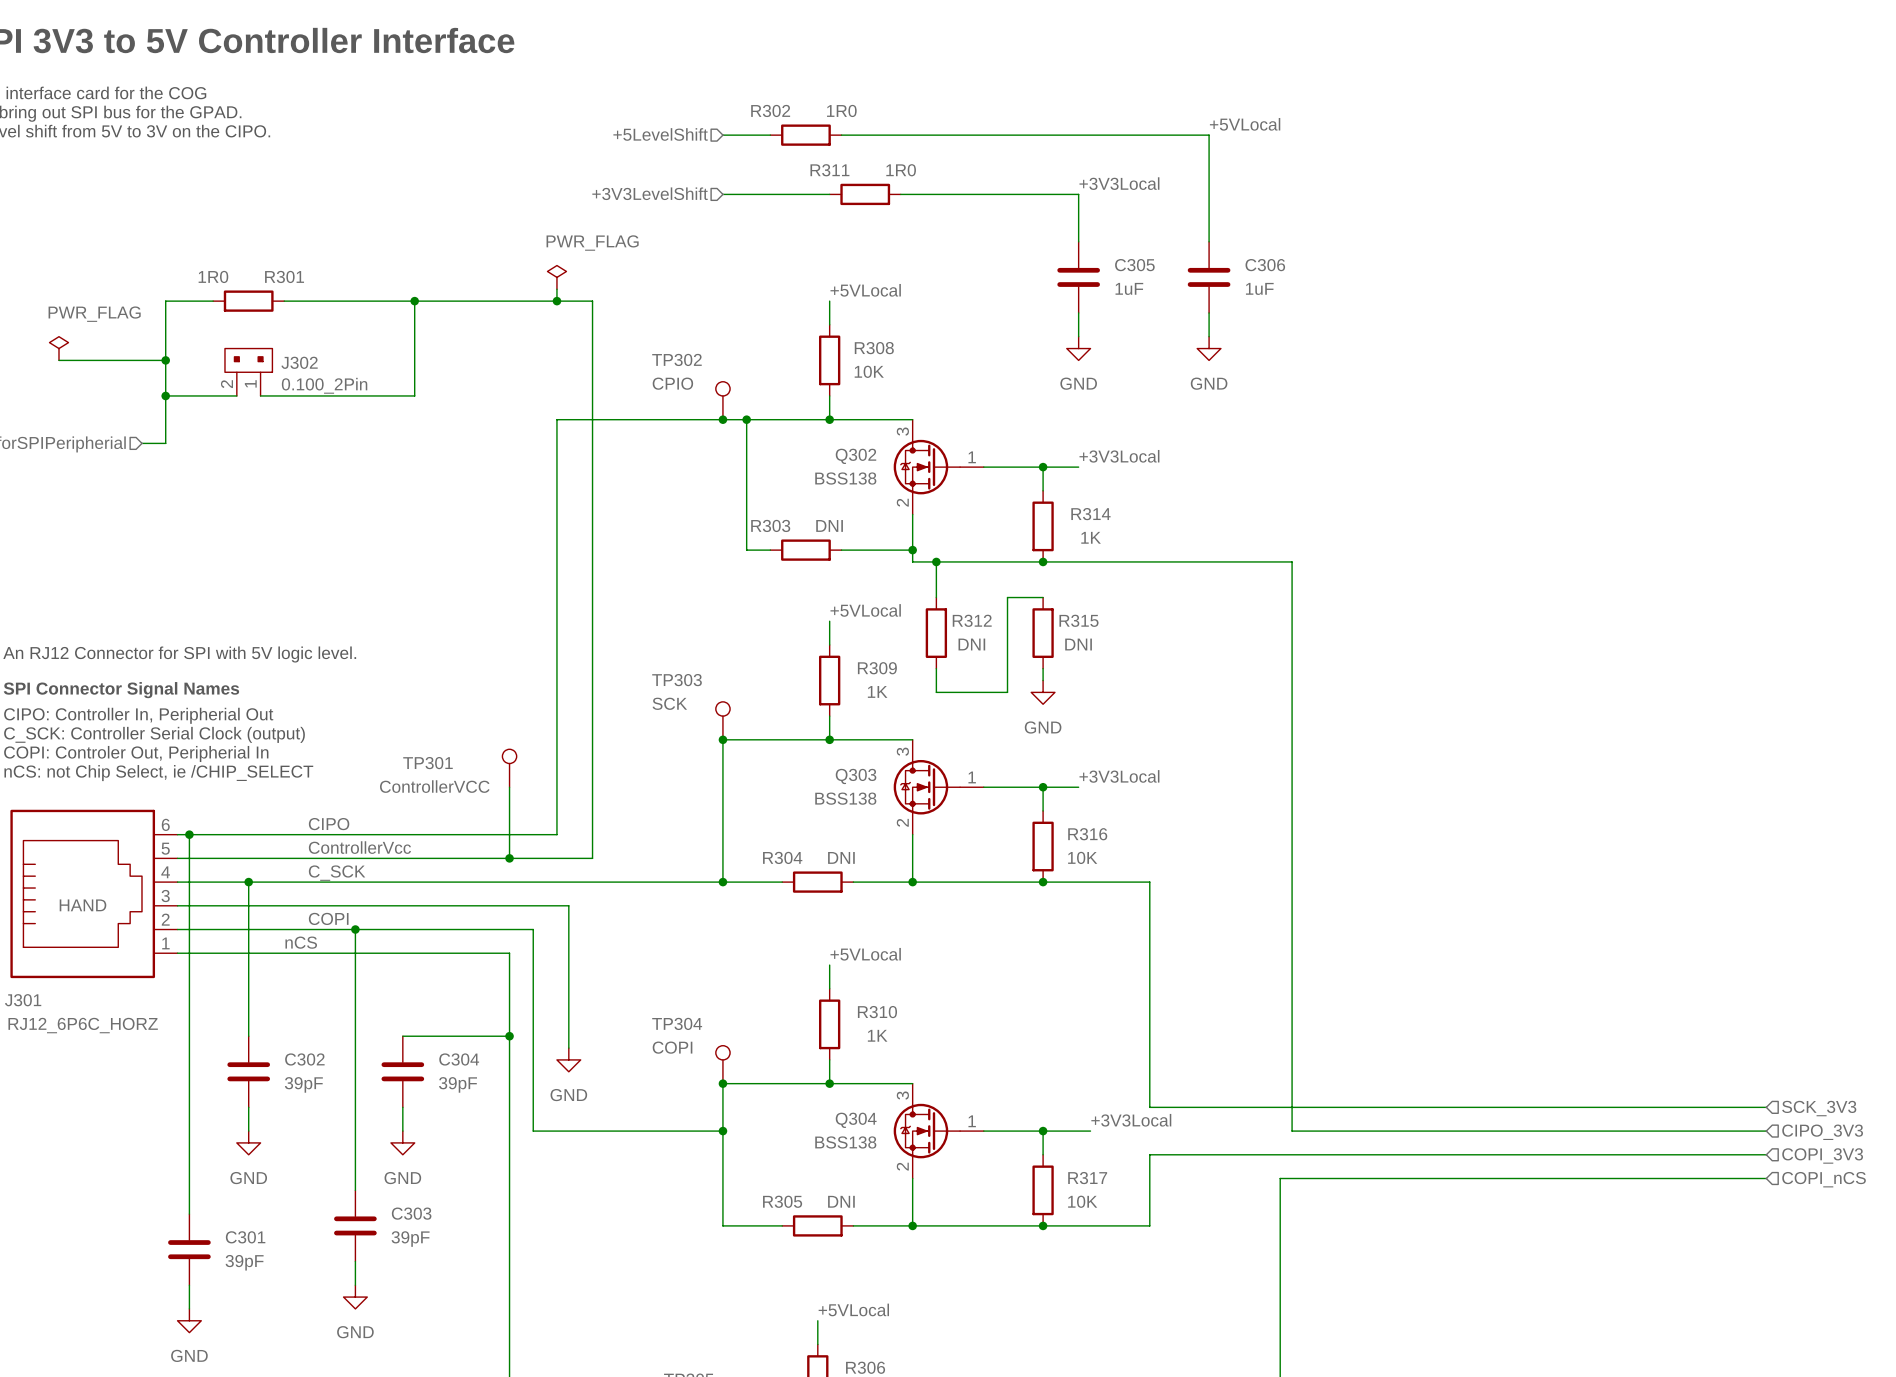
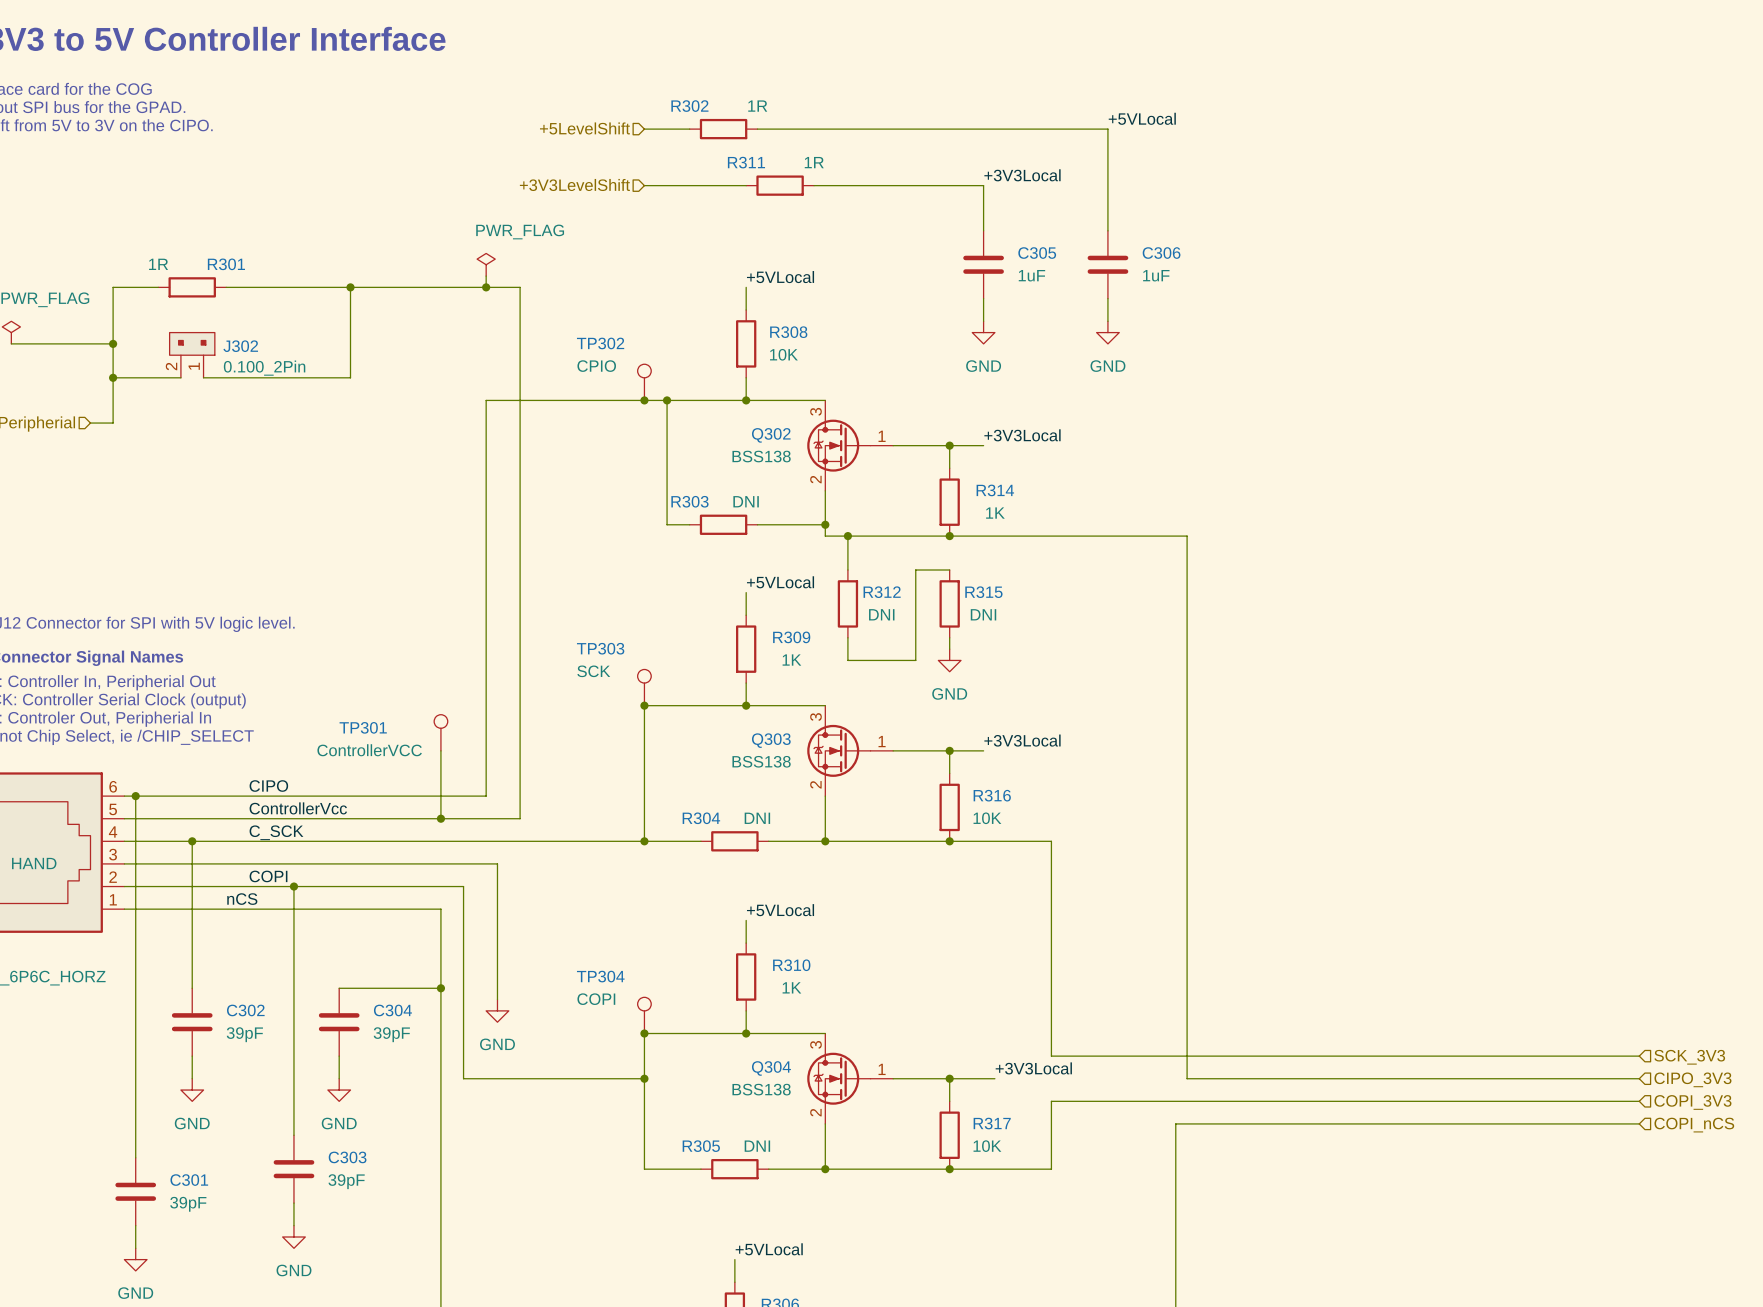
R302 value: 1R0 (841, 110) -> 1R (757, 106)
R311 value: 1R0 (901, 170) -> 1R (814, 162)
R301 value: 1R0 (213, 276) -> 1R (158, 264)

